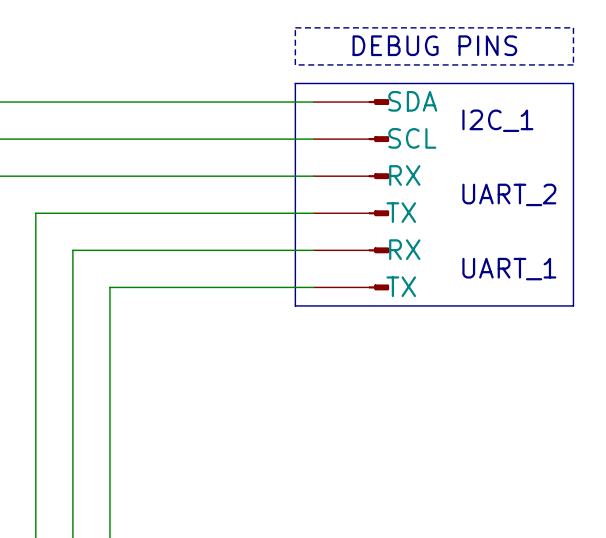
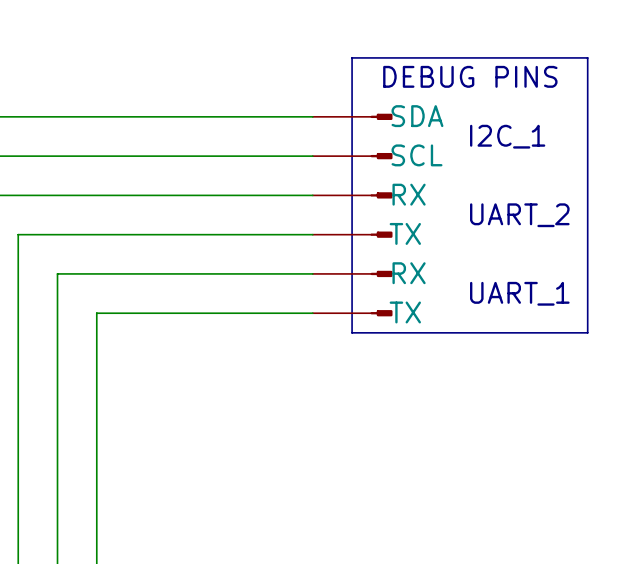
line: (295, 27) (573, 27) (573, 64) (295, 64) (295, 27) -> none
text position: DEBUG PINS (434, 45) -> DEBUG PINS (470, 76)
line: (573, 83) (295, 83) (295, 305) (350, 305) -> (587, 97) (587, 57) (352, 57) (352, 332)

